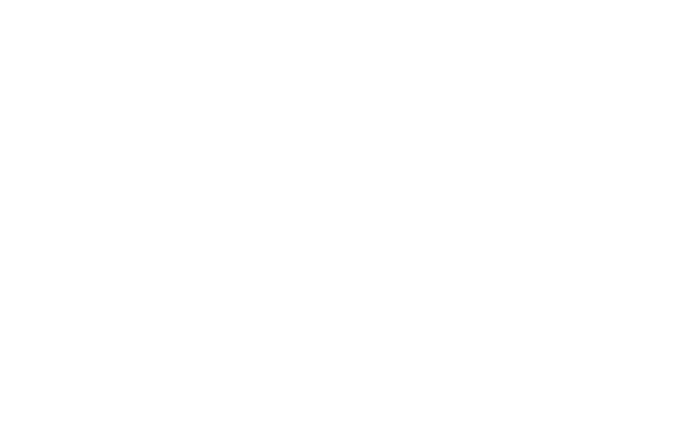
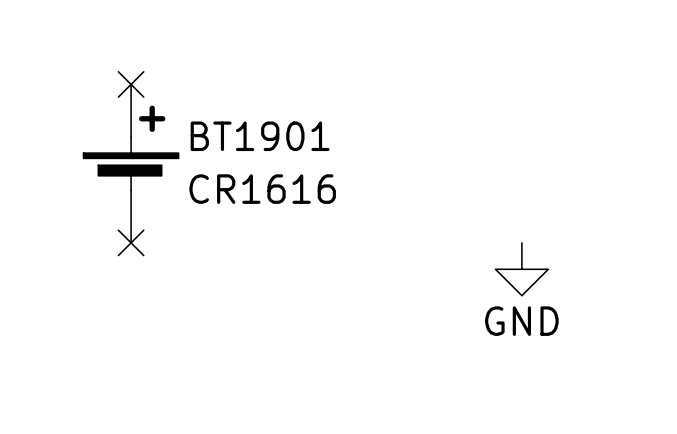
no-connect mark: none -> (131, 84)
BT1901: none -> CR1616 (131, 163)
no-connect mark: none -> (131, 242)
power symbol: none -> GND (521, 269)

